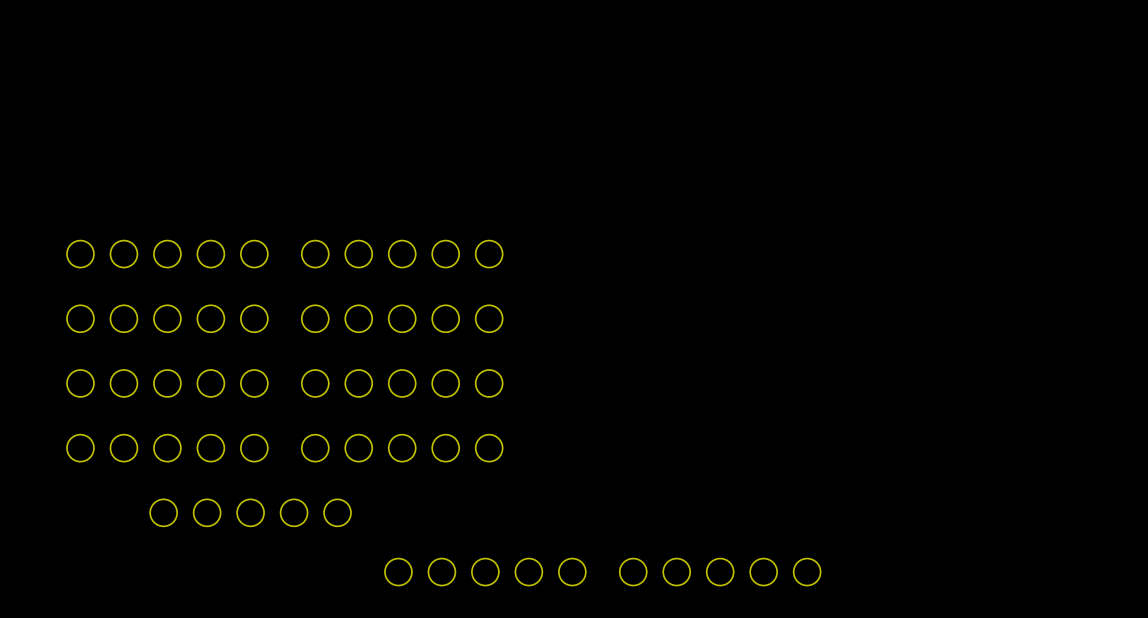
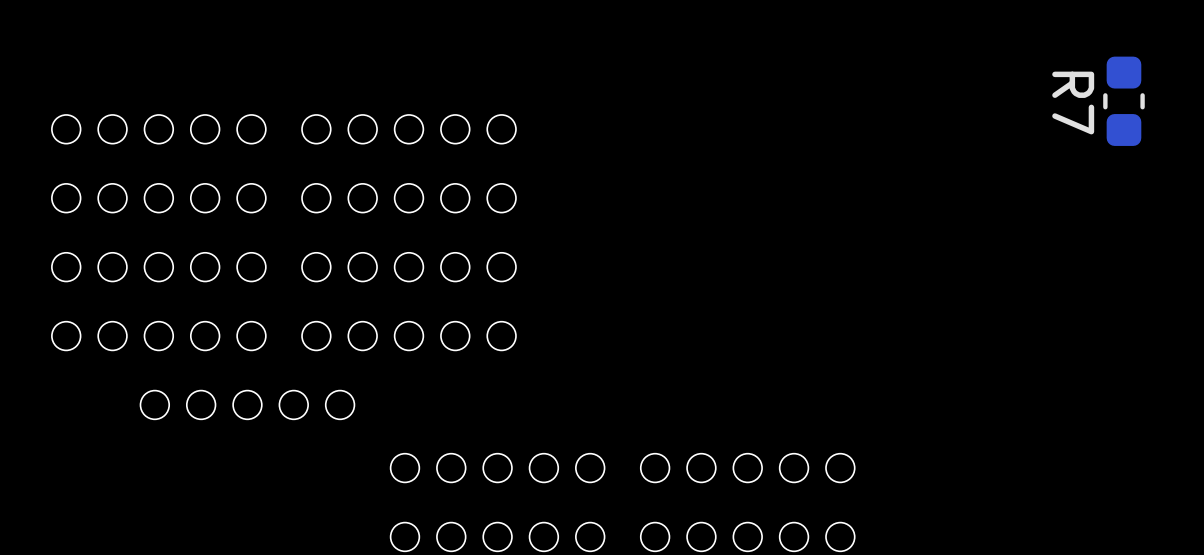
R7: none -> (1123, 101)

